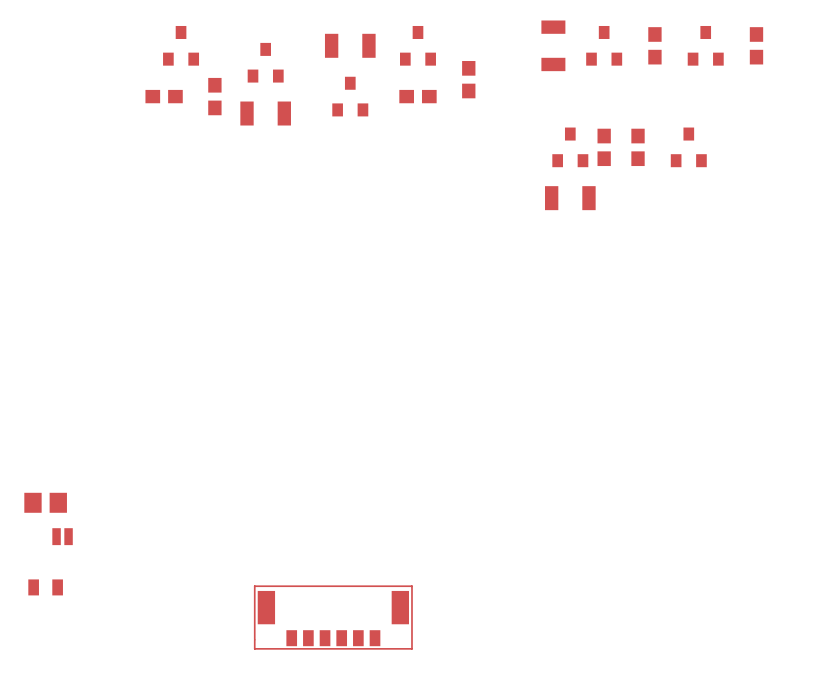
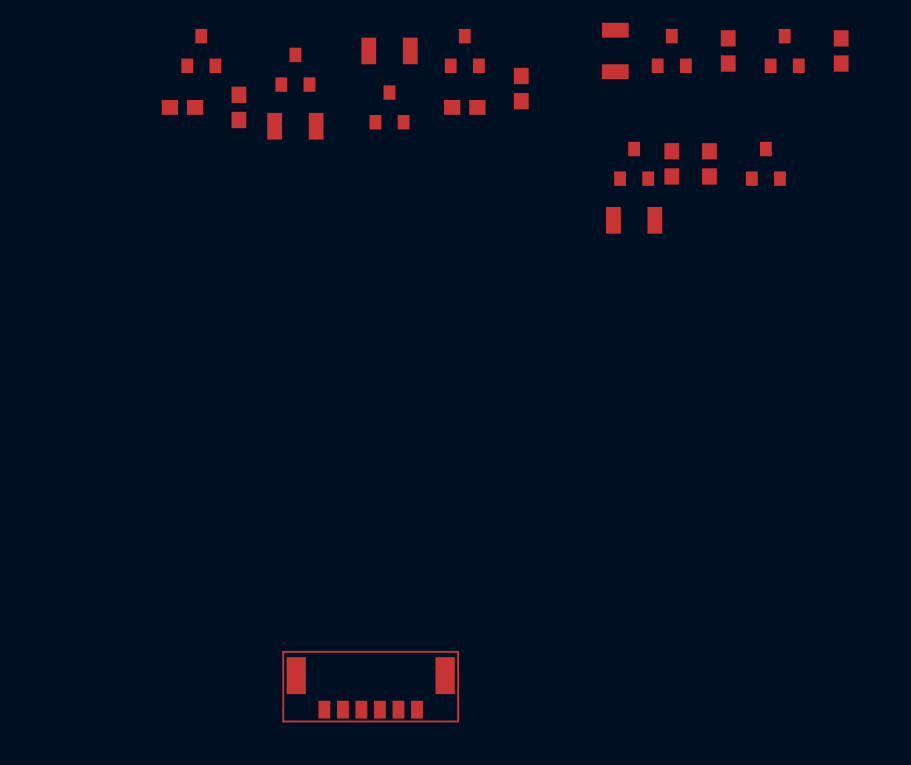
part: (45, 502) -> none
part: (62, 536) -> none
part: (45, 587) -> none

